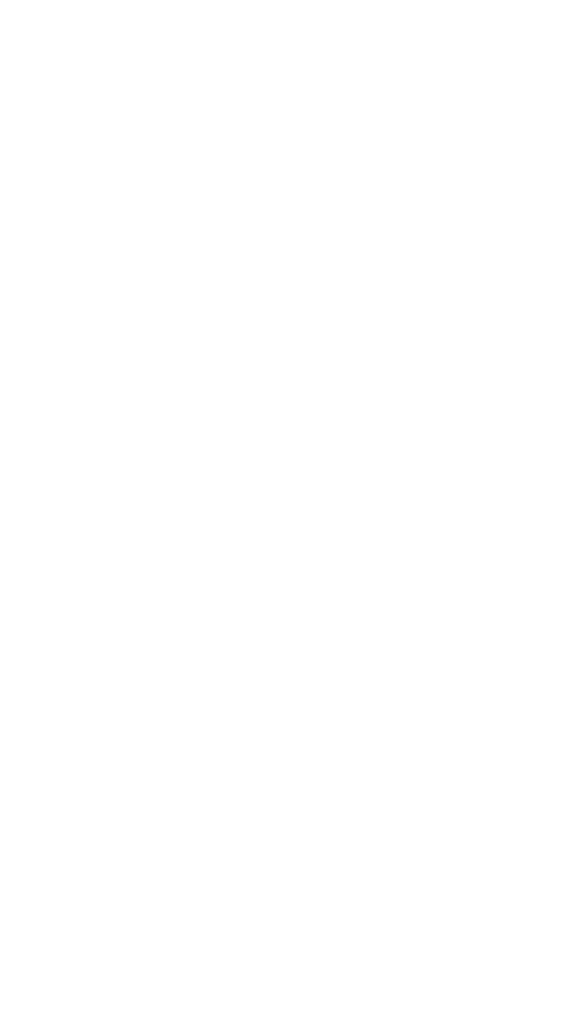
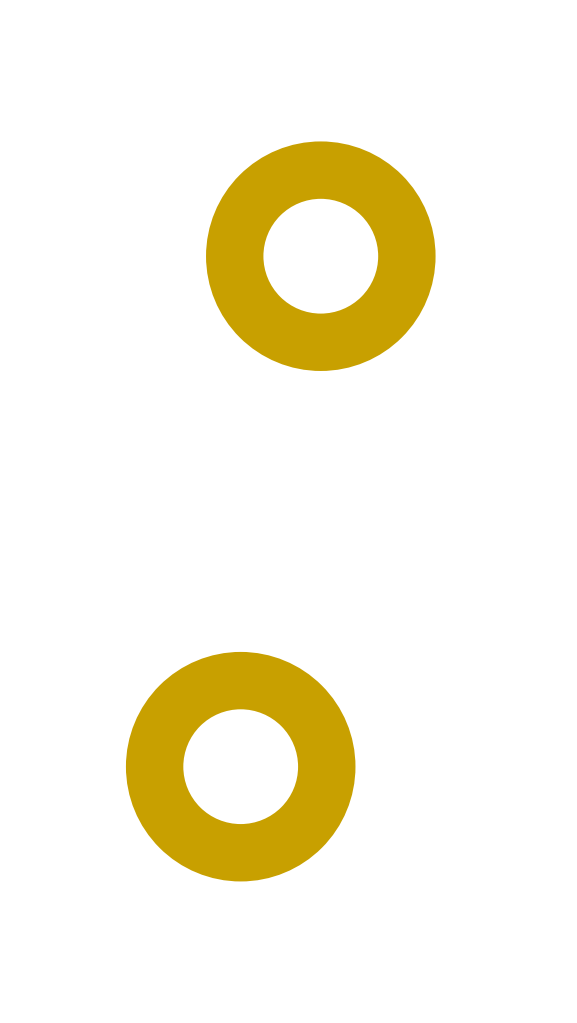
part: none -> (320, 256)
part: none -> (240, 766)

